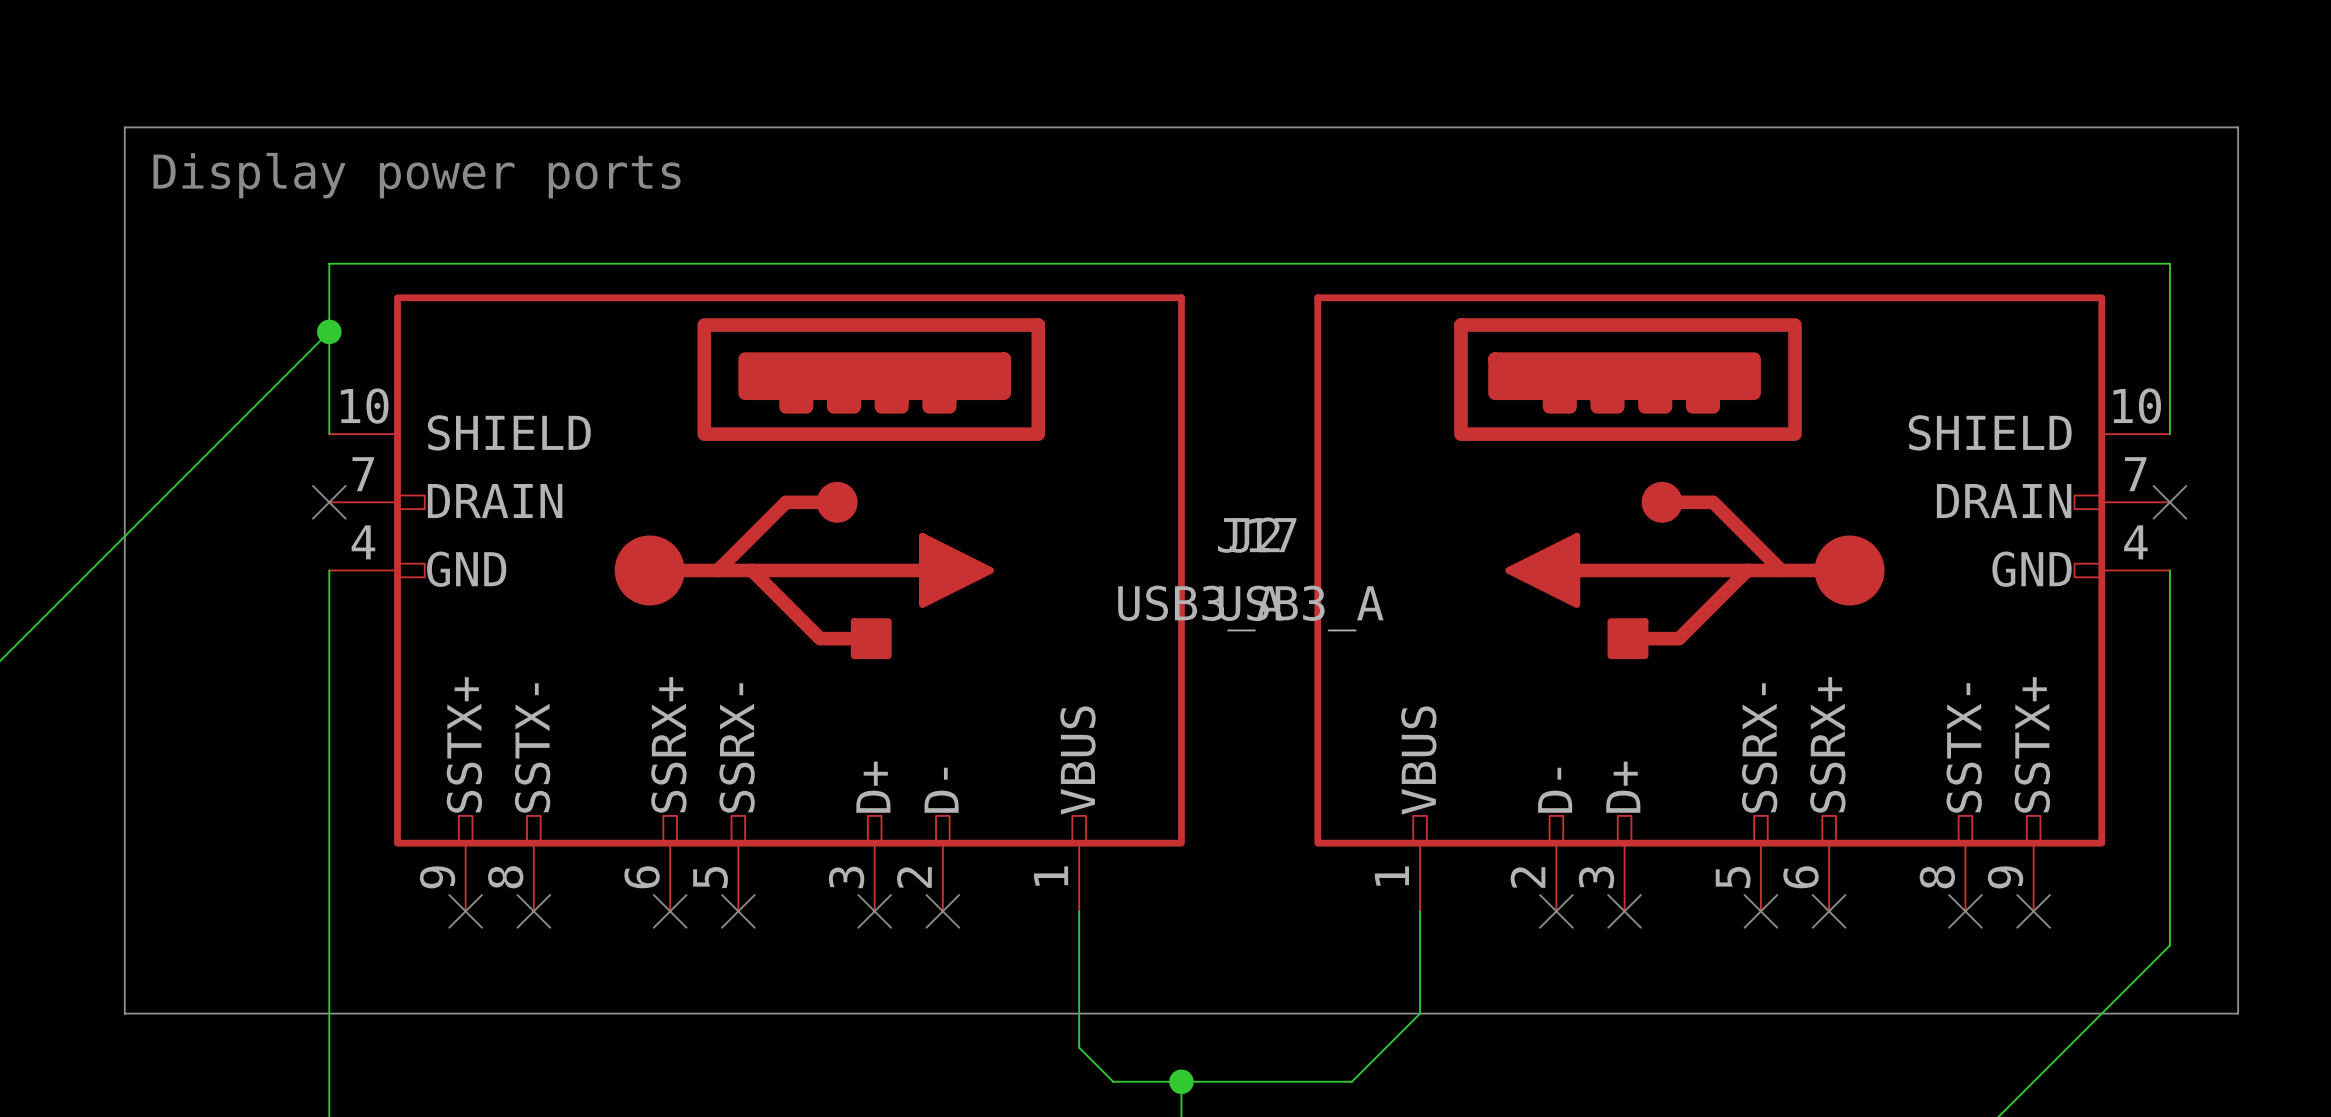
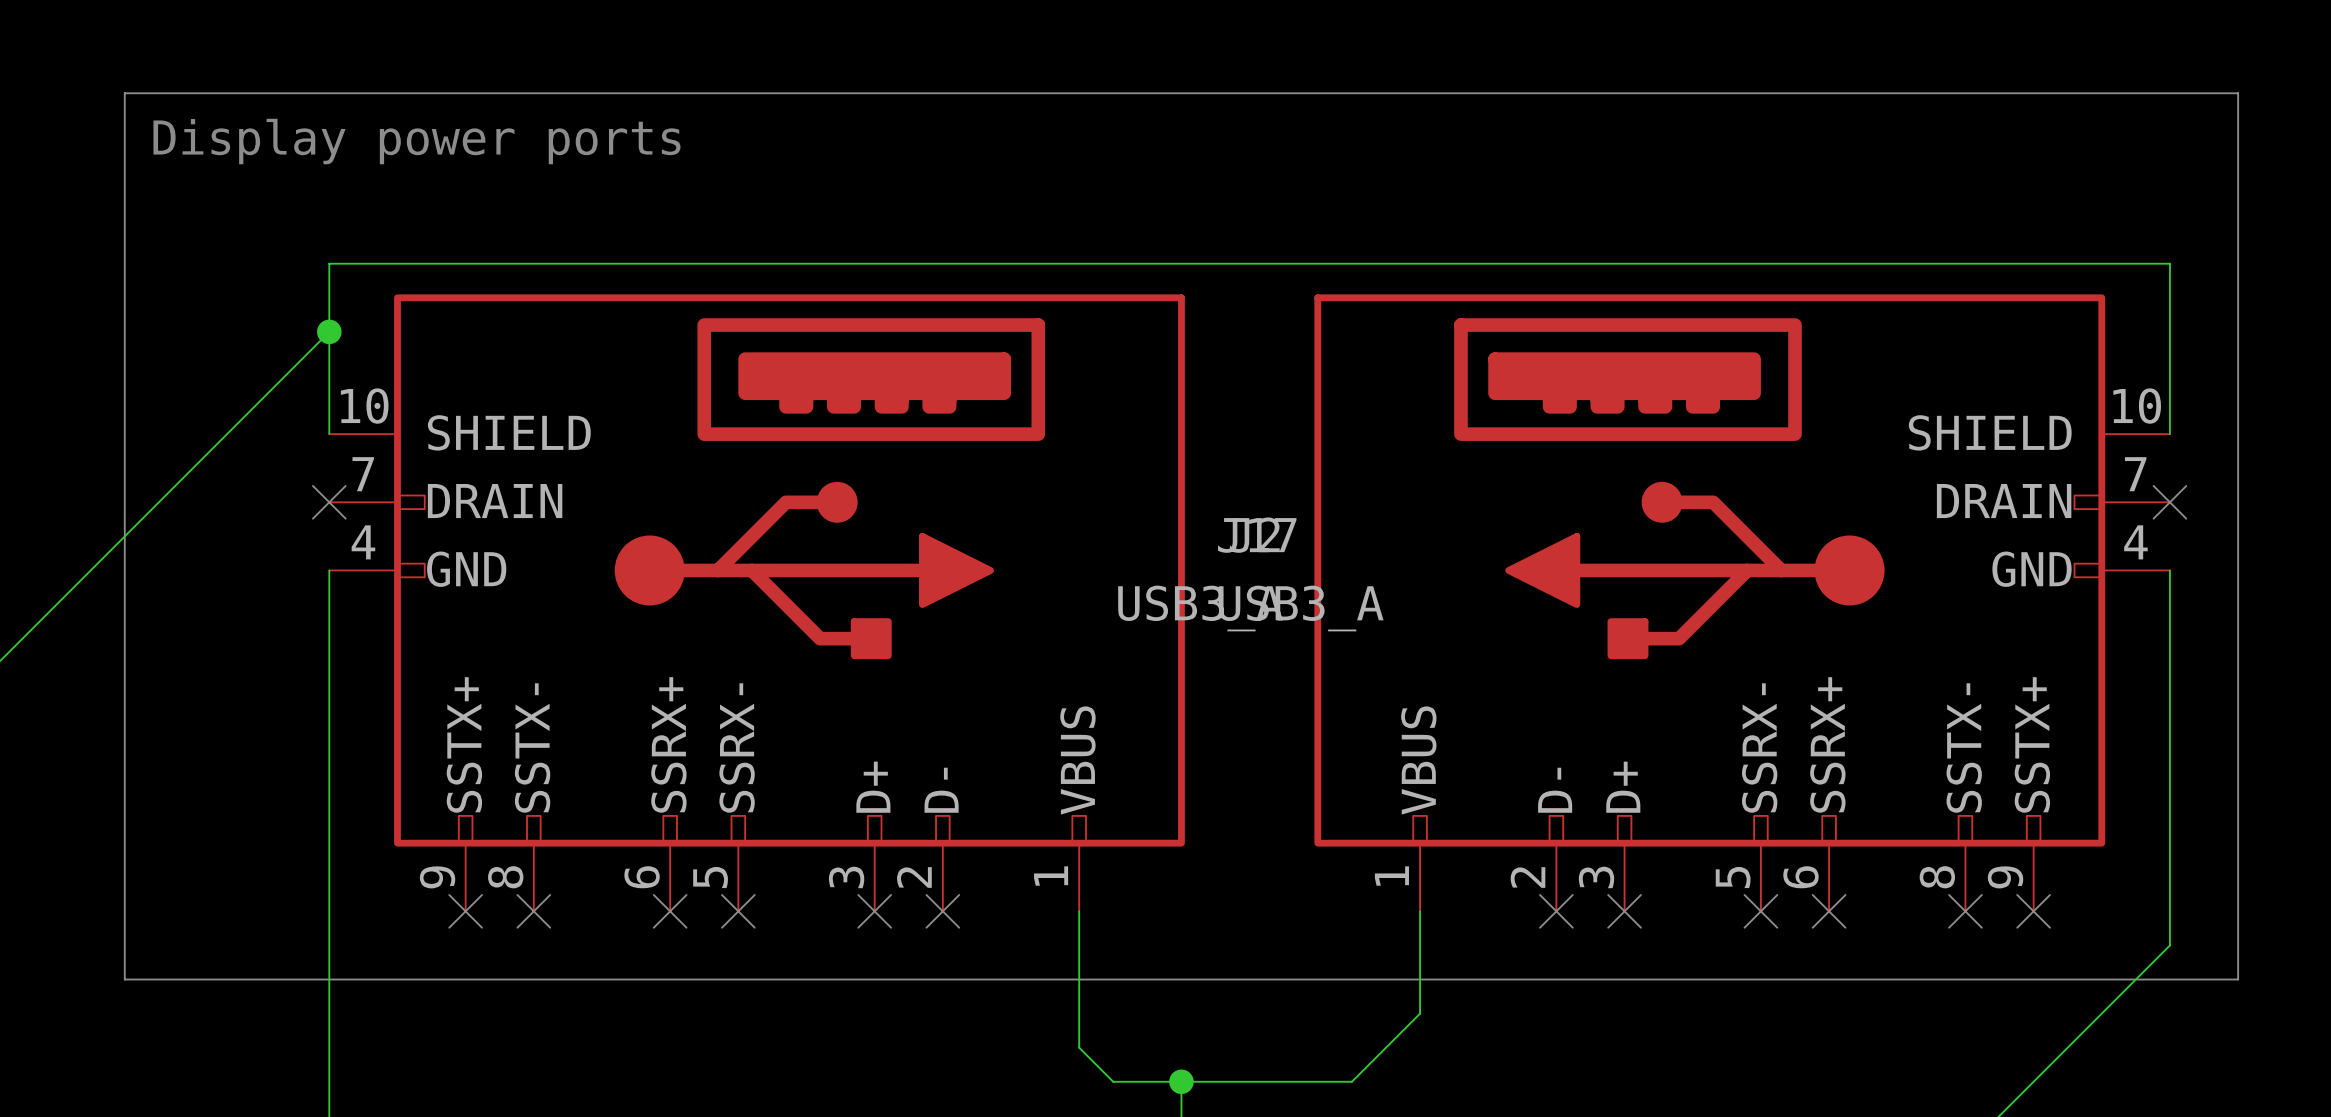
line: (124, 127) (2238, 127) -> (124, 127) (124, 93) (2238, 93) (2238, 127)
text position: Display power ports (417, 175) -> Display power ports (417, 141)
line: (124, 979) (124, 1013) (2238, 1013) (2238, 979) -> (124, 979) (2238, 979)

